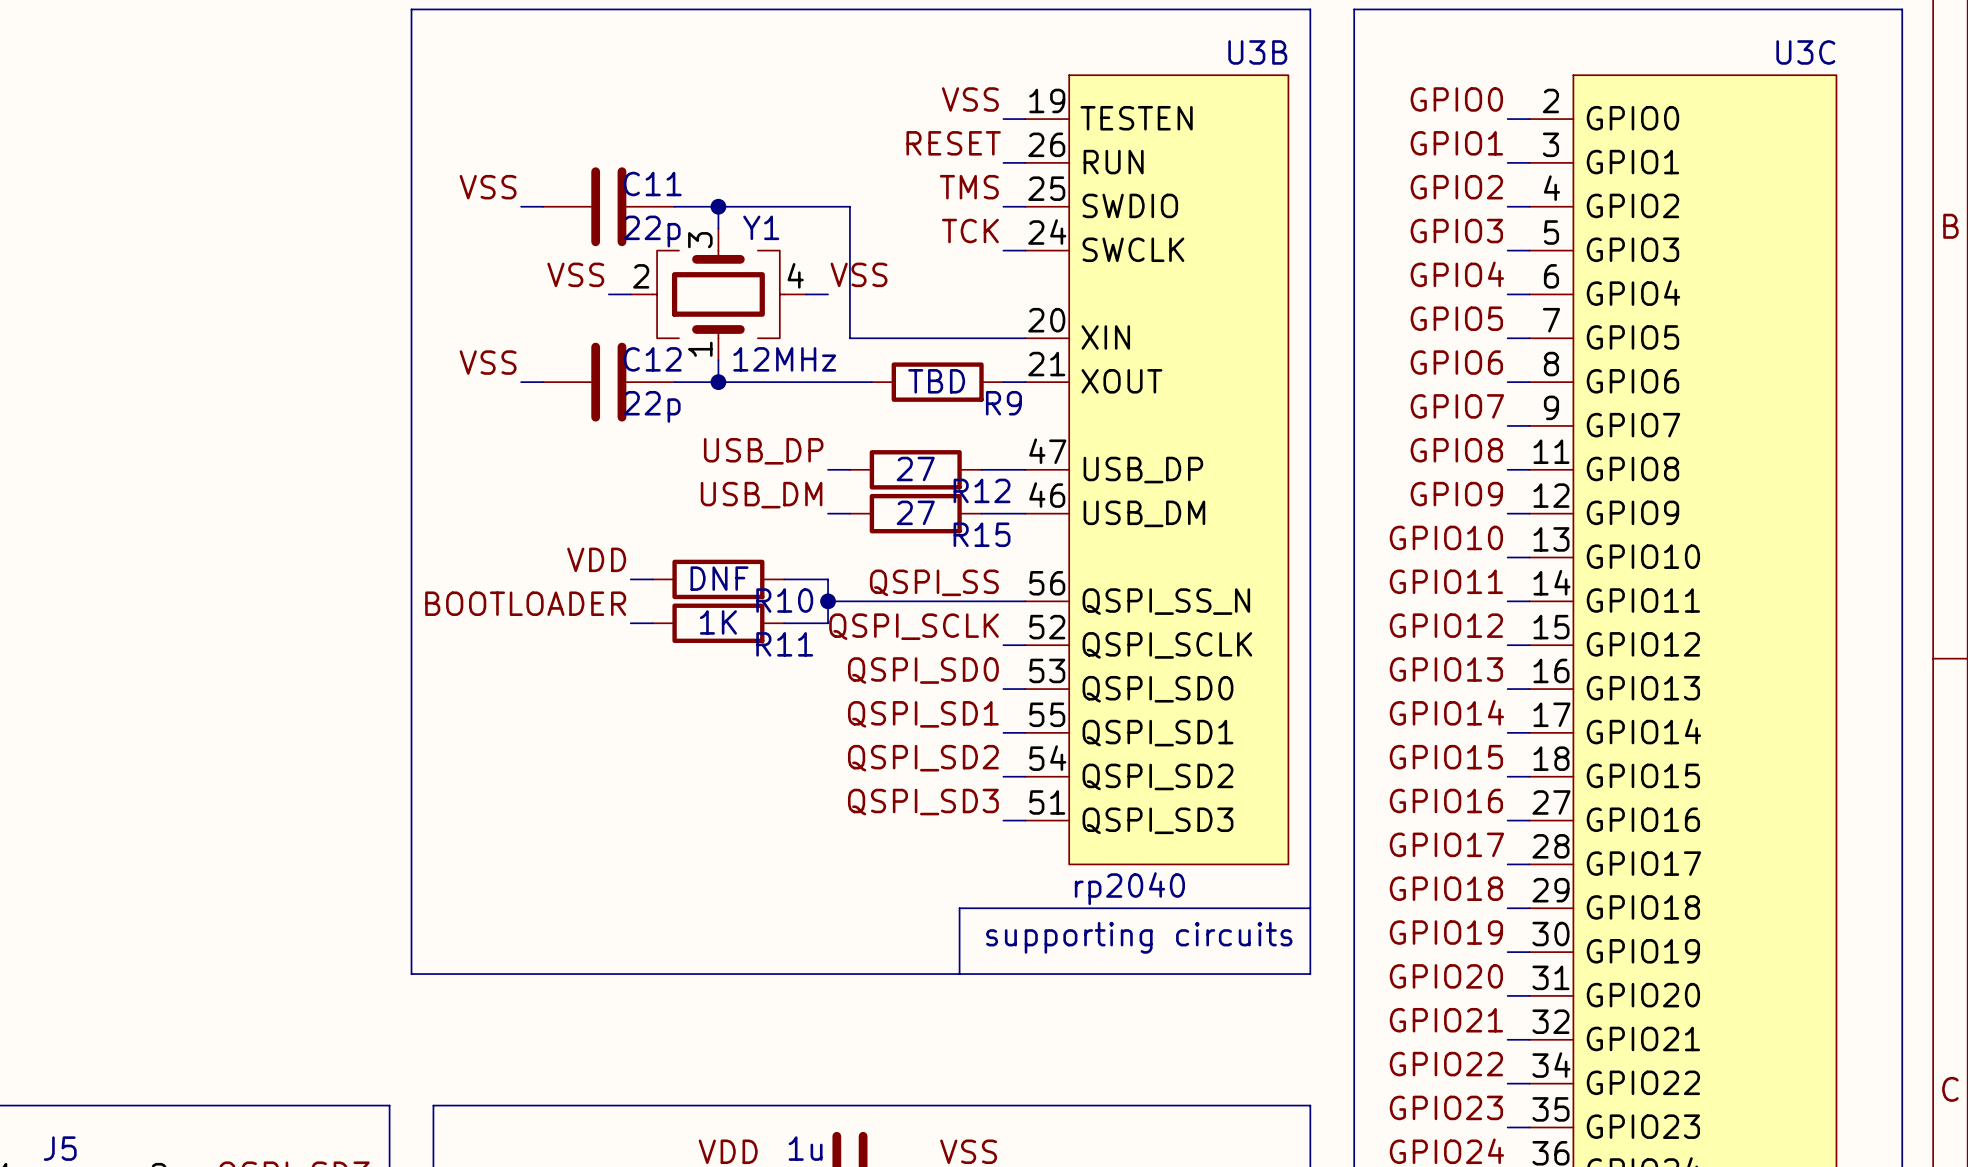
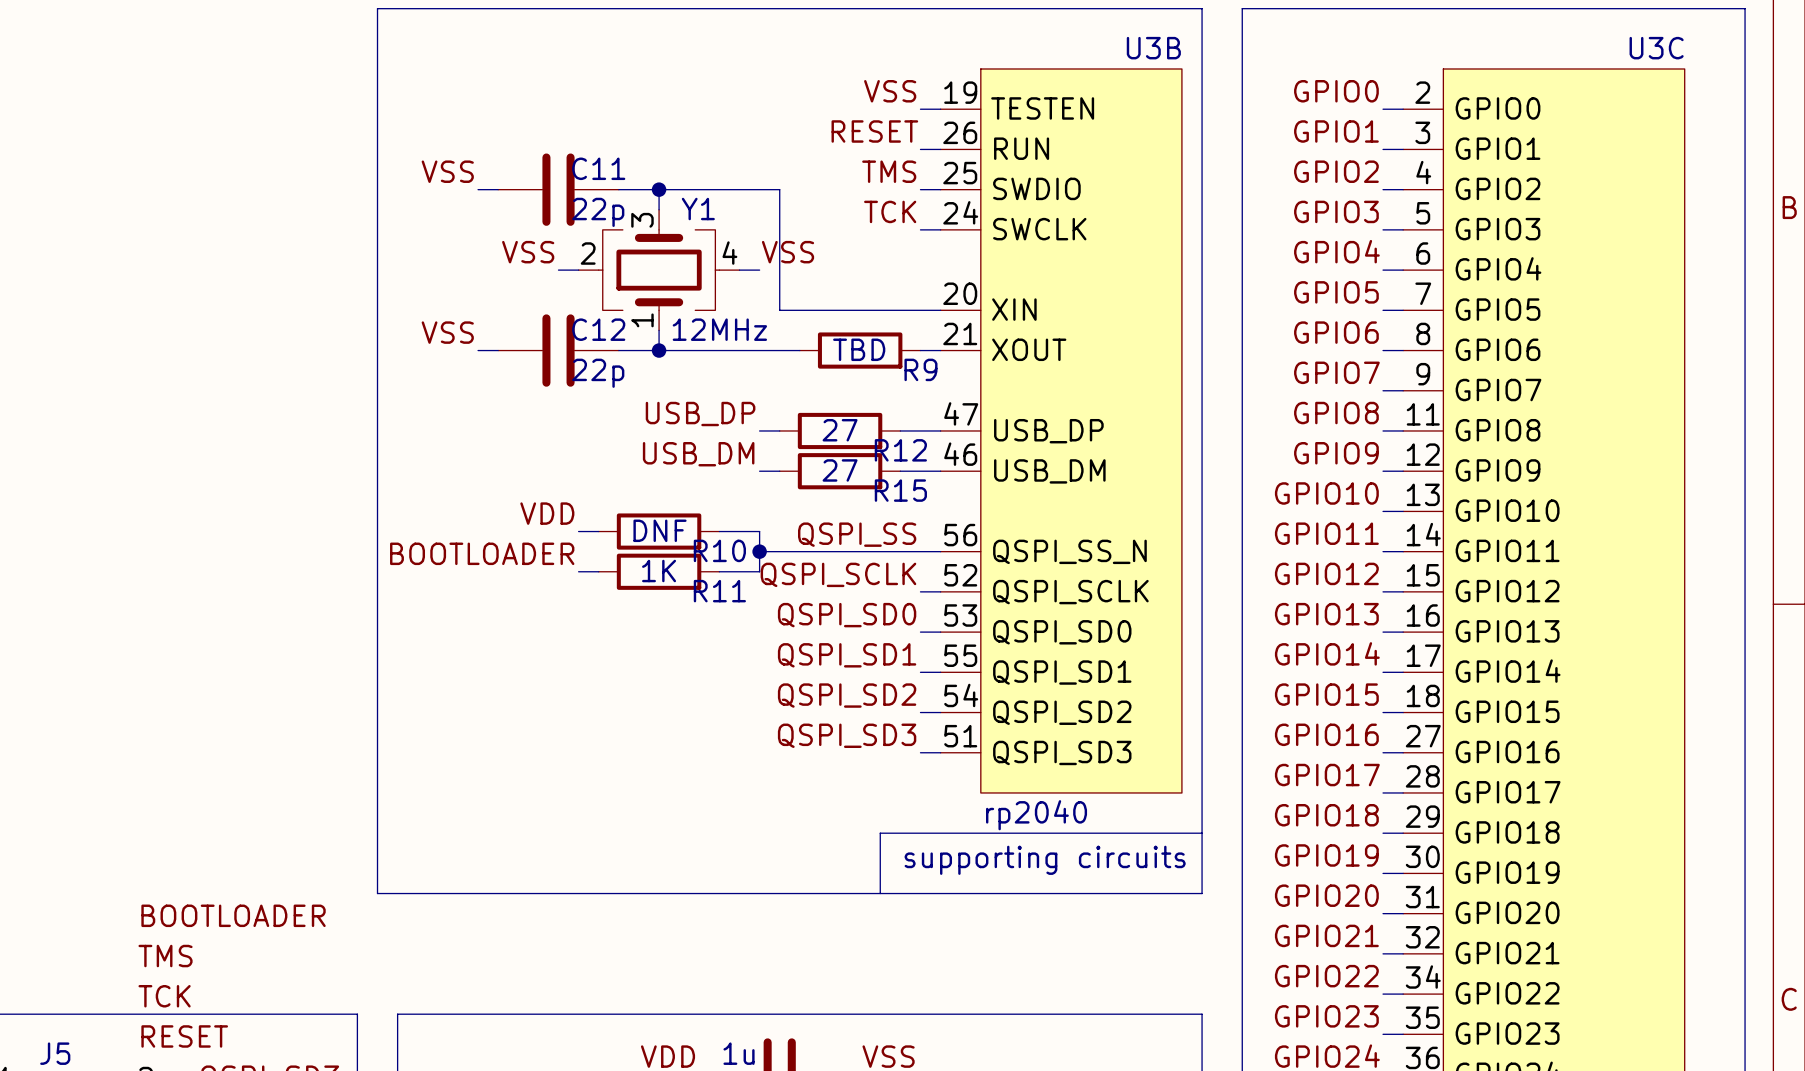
label: none -> BOOTLOADER (233, 915)
label: none -> TMS (165, 956)
label: none -> TCK (164, 996)
label: none -> RESET (184, 1036)

